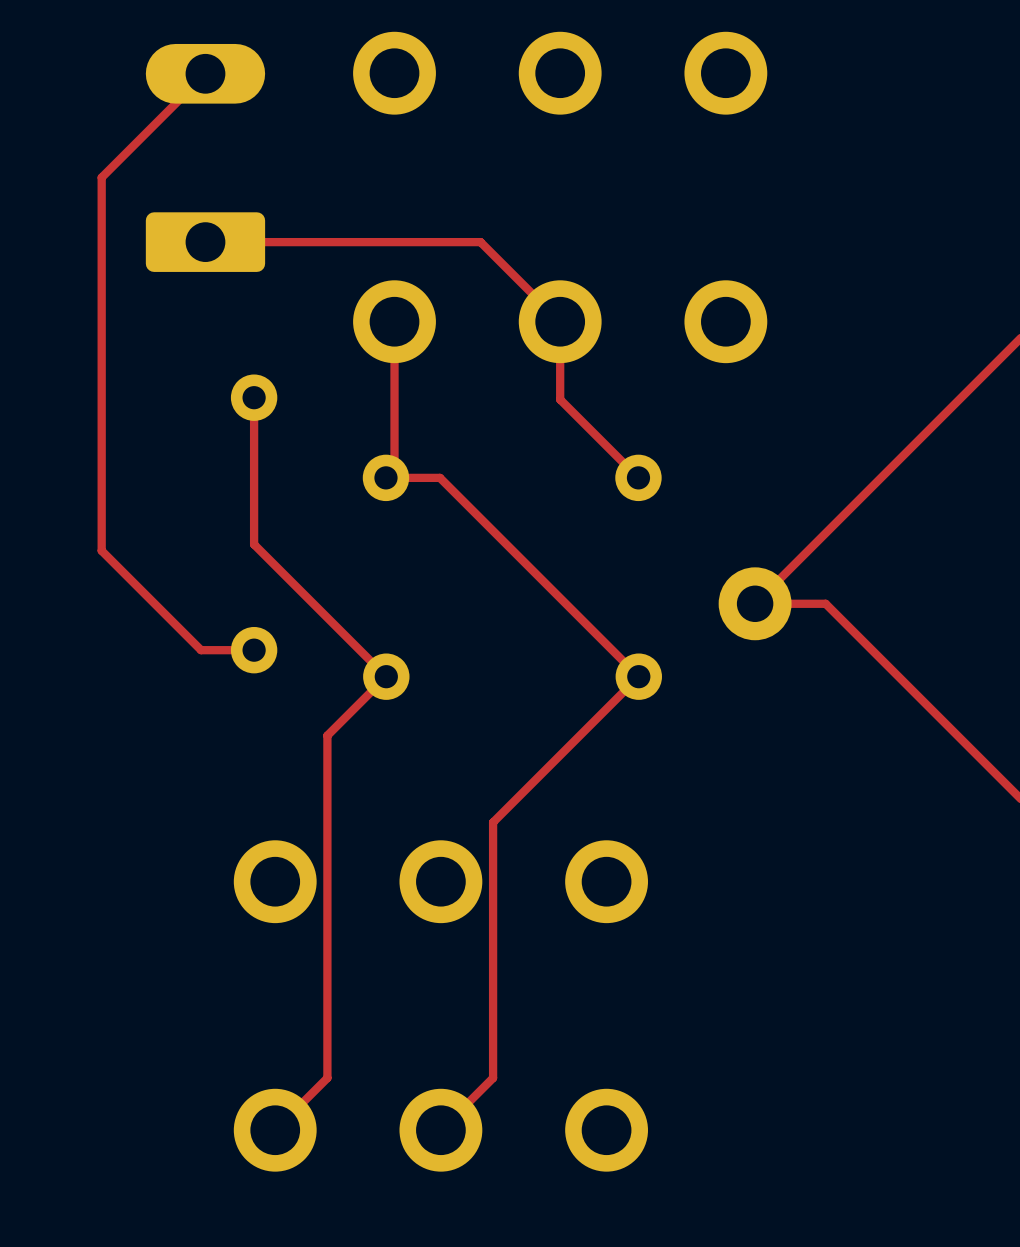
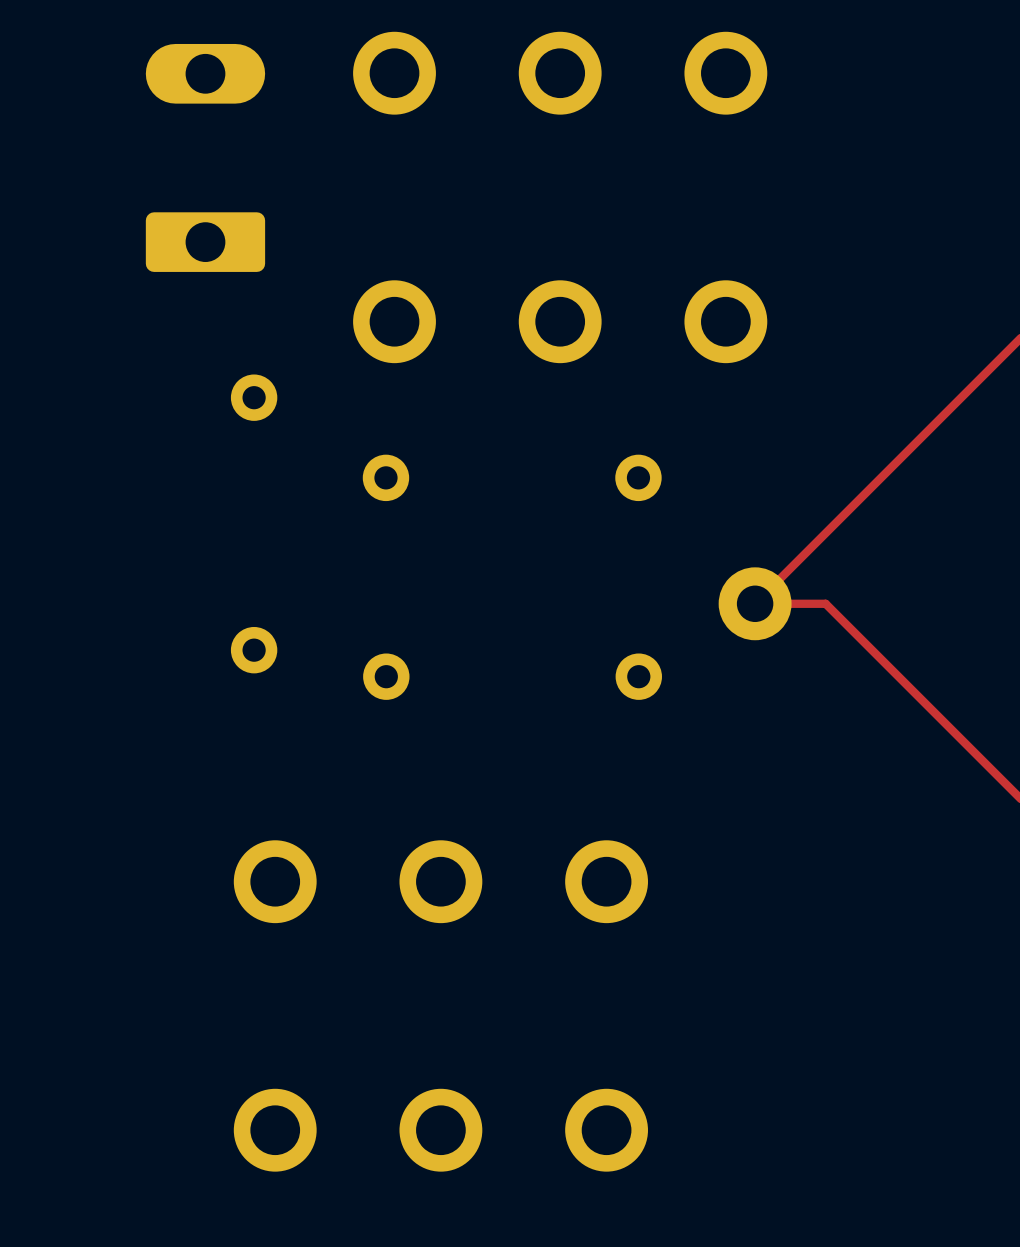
top track: (200, 73) (205, 73) (101, 177) (101, 550) (201, 650) (254, 650) -> none
top track: (205, 242) (480, 242) (560, 321) (560, 399) (638, 477) -> none
top track: (394, 321) (394, 469) (385, 477) (439, 477) (638, 676) (493, 822) (493, 1078) (440, 1130) -> none
top track: (254, 397) (254, 544) (386, 676) (327, 735) (327, 1078) (275, 1130) -> none

